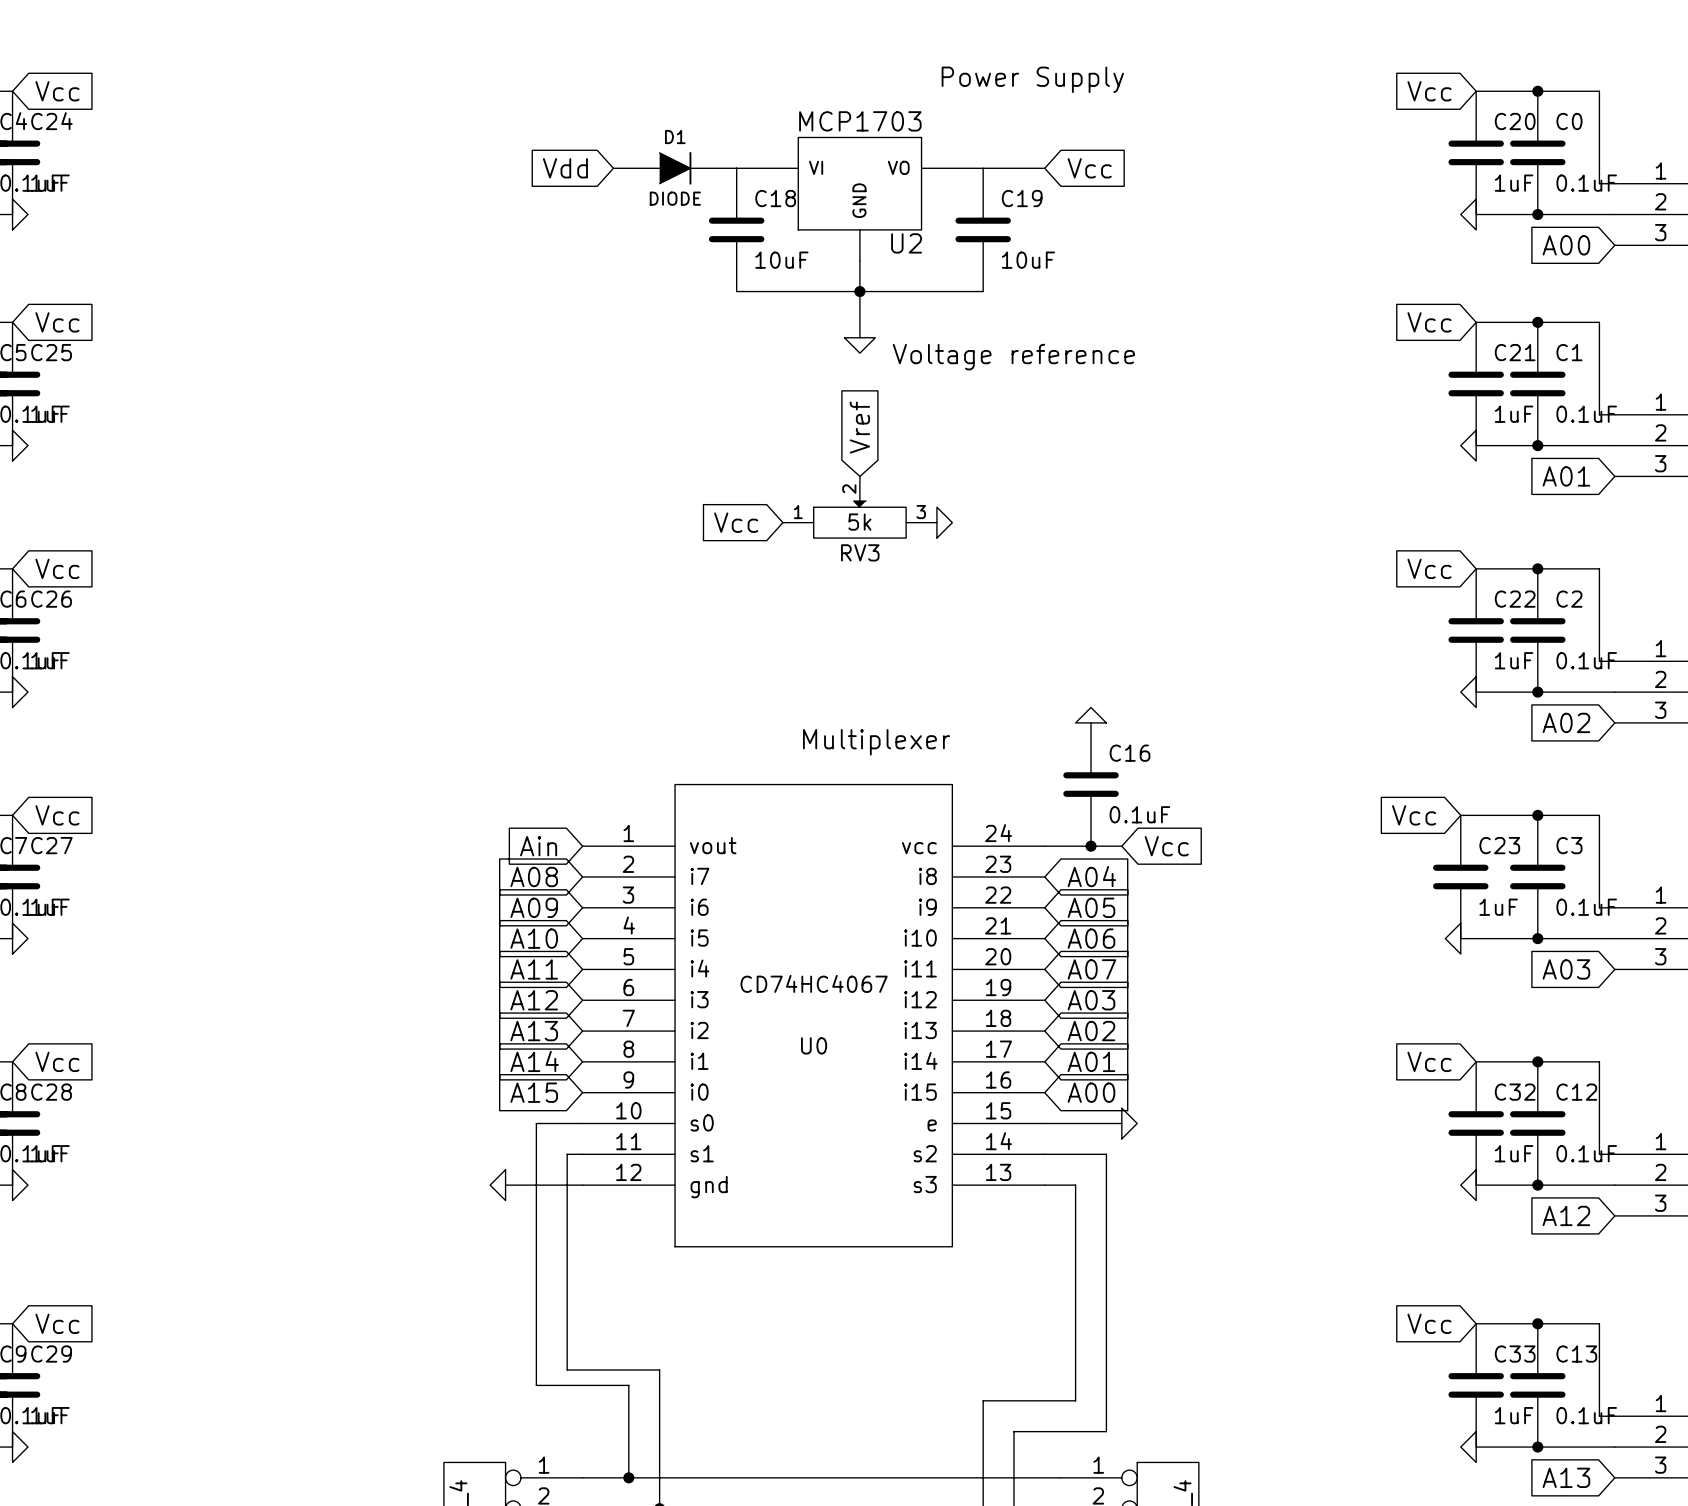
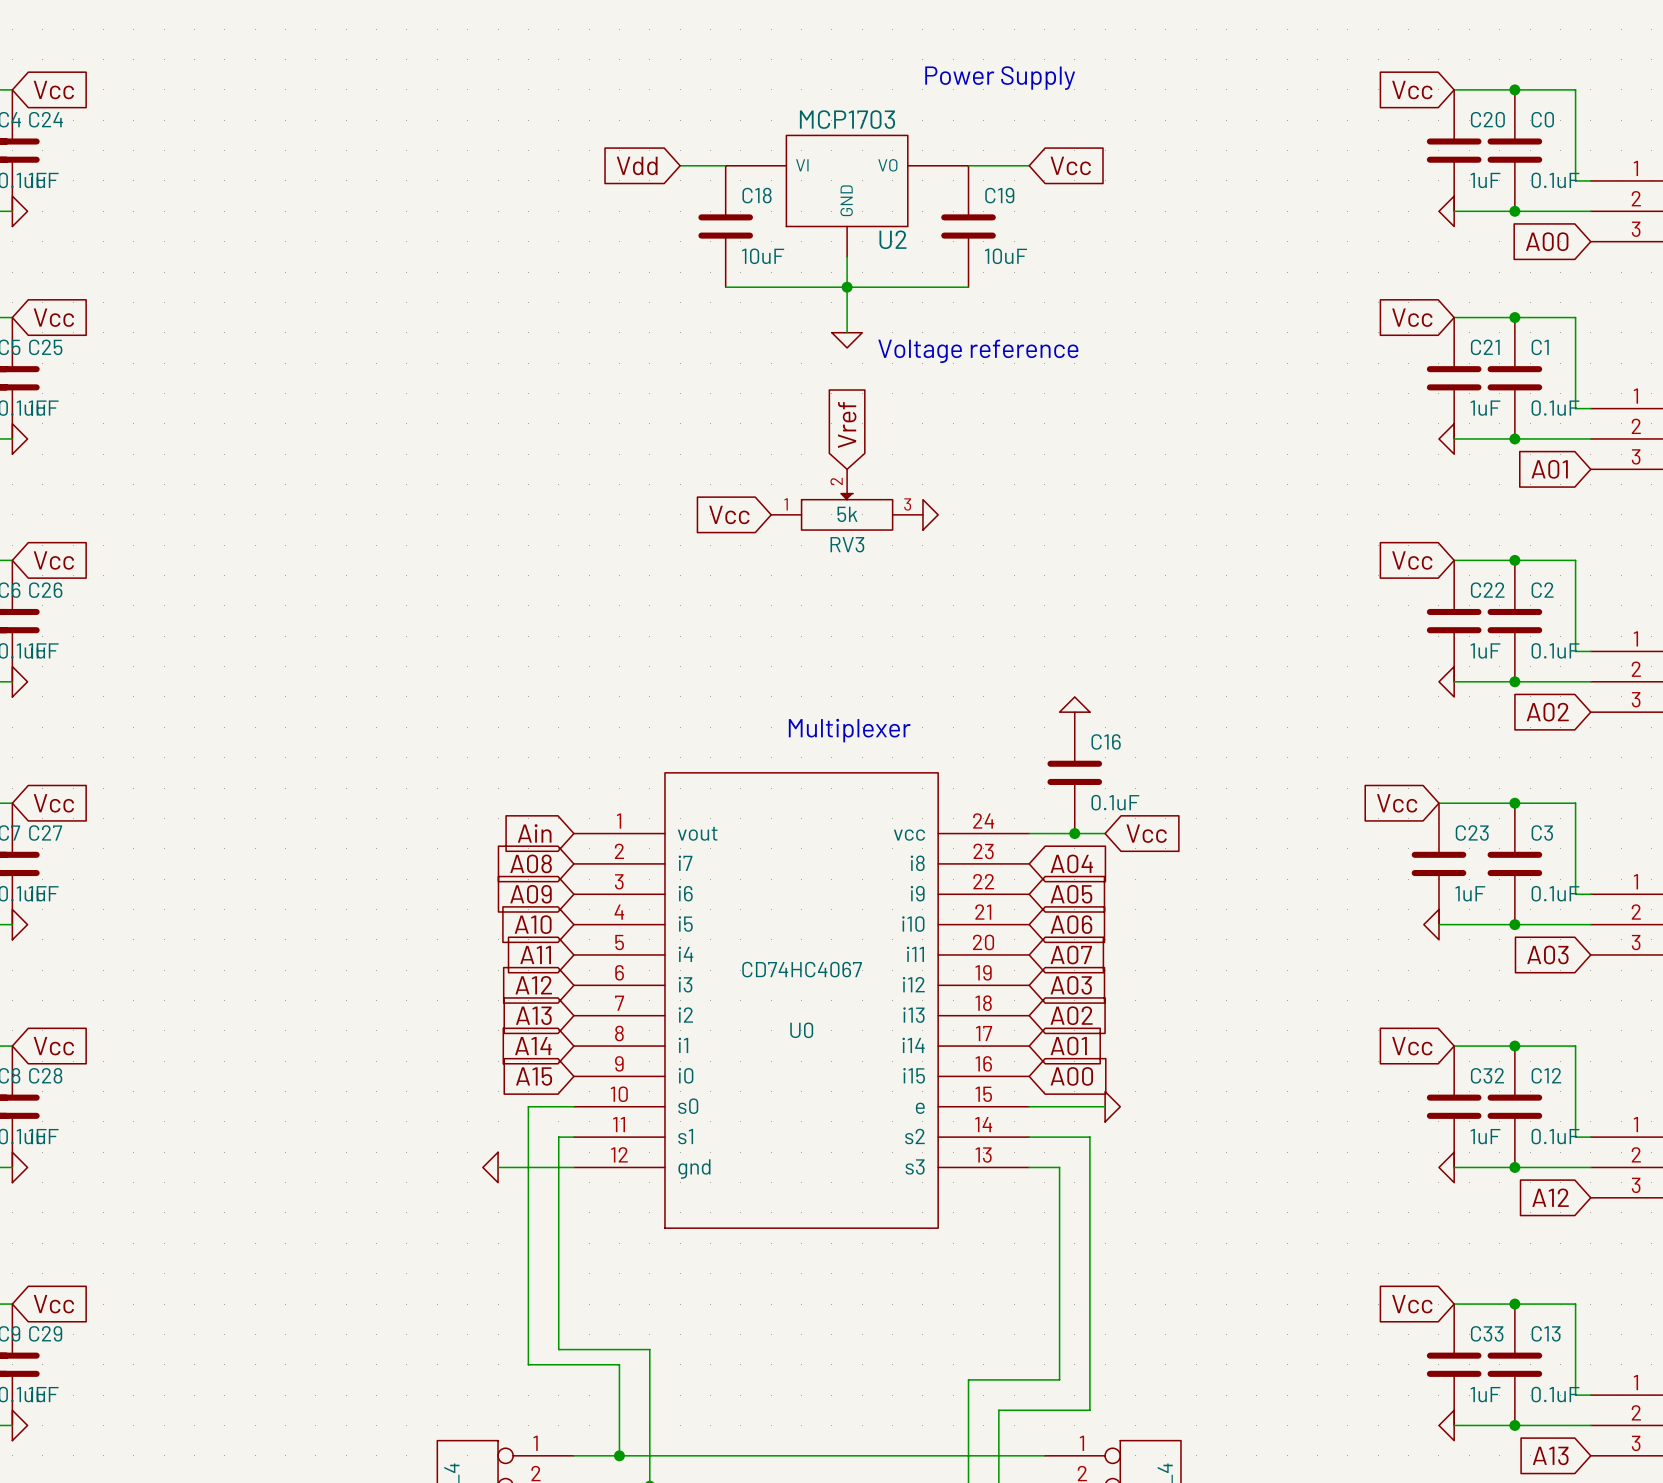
global label position: Vdd (565, 168) -> Vdd (637, 165)
D1: DIODE (675, 168) -> none

